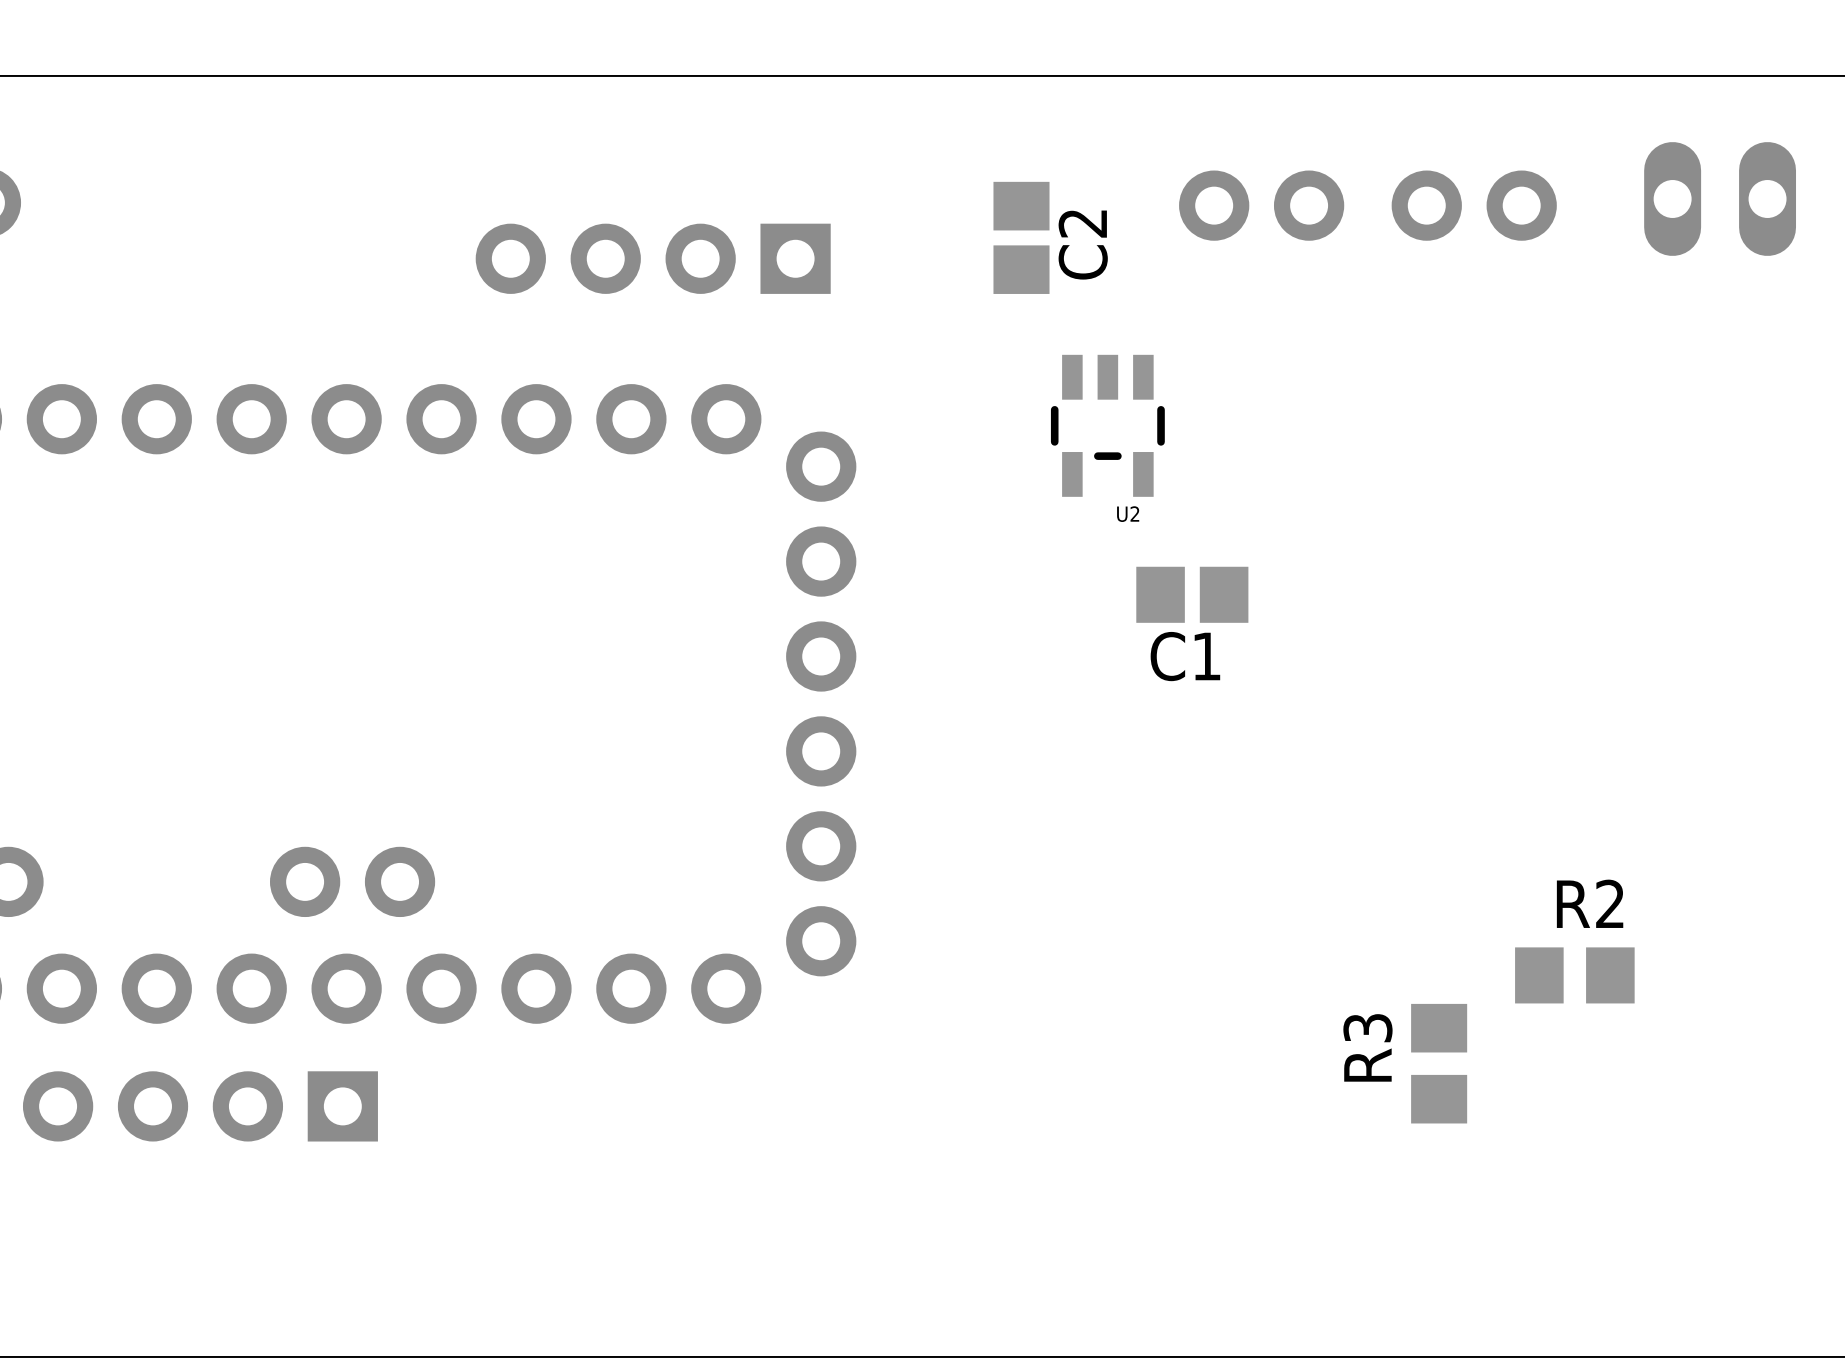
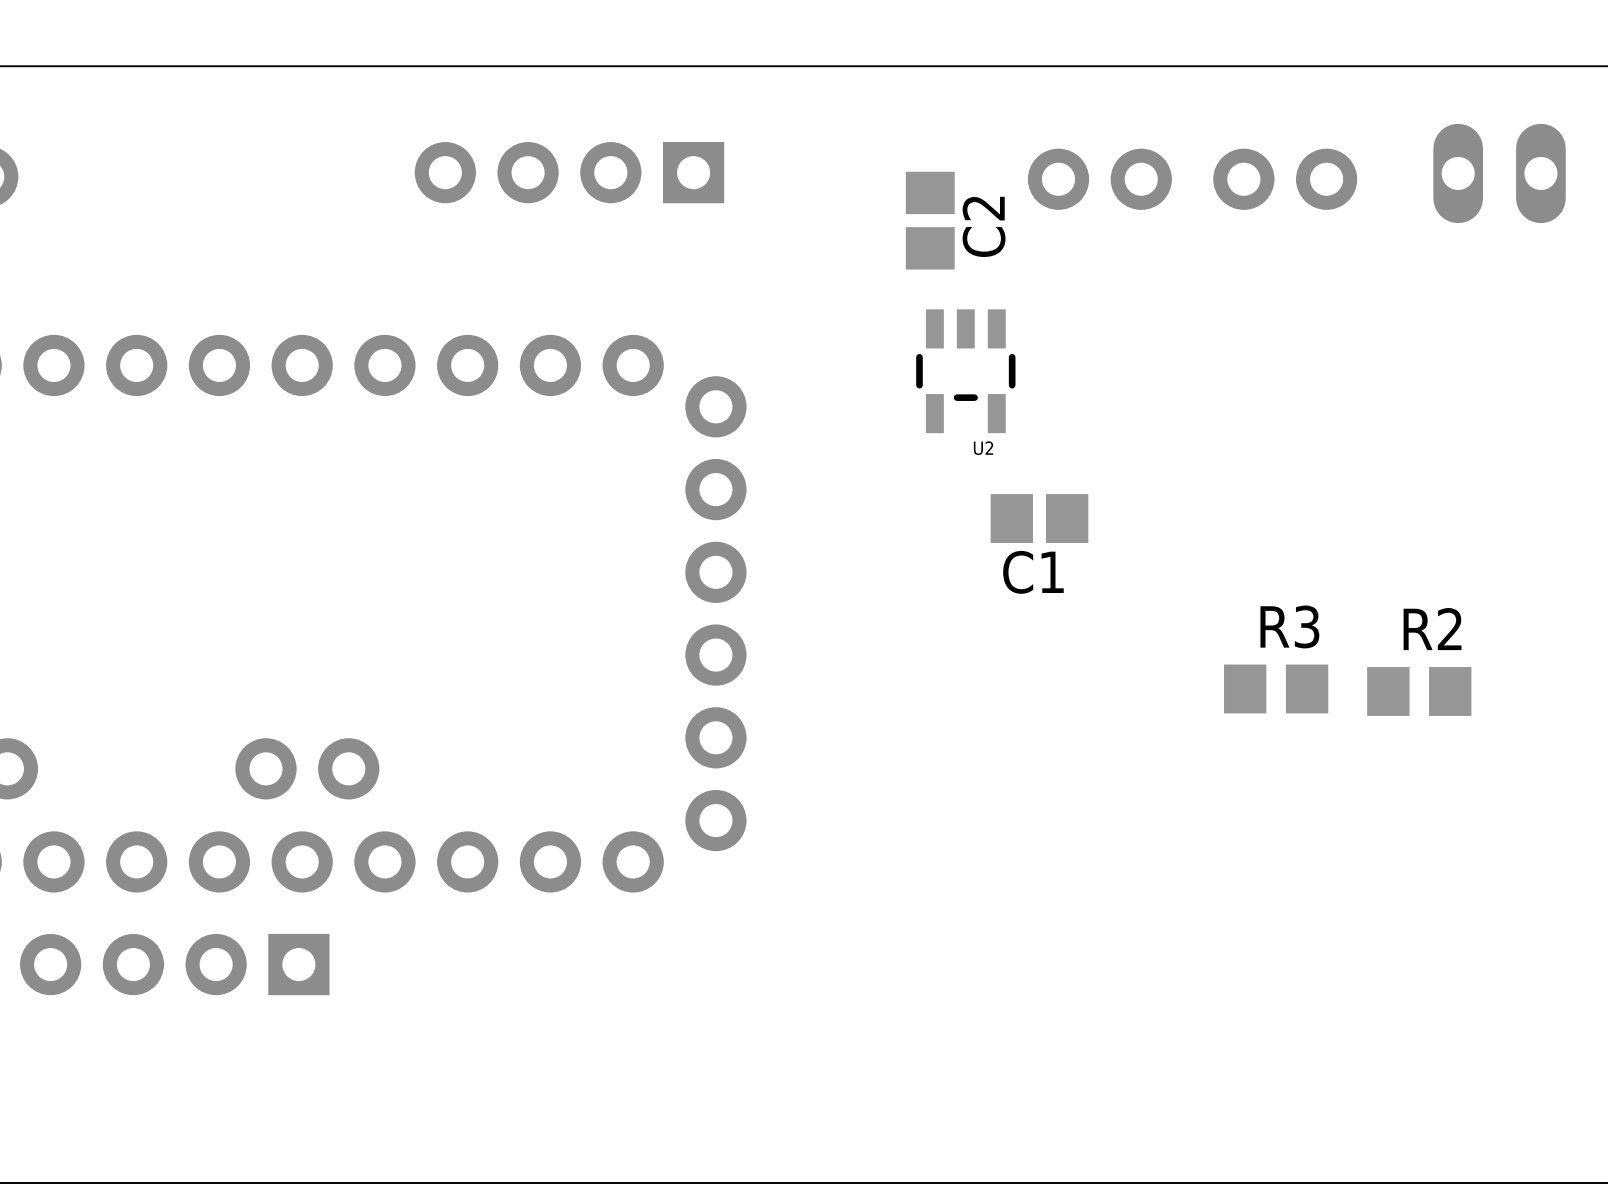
C2 position: (1021, 237) -> (930, 220)
part position: (653, 258) -> (569, 172)
R2 position: (1574, 975) -> (1419, 691)
R3 rotation: 0° (1439, 1063) -> 90° clockwise (1276, 689)
R3 position: (1439, 1063) -> (1276, 689)

